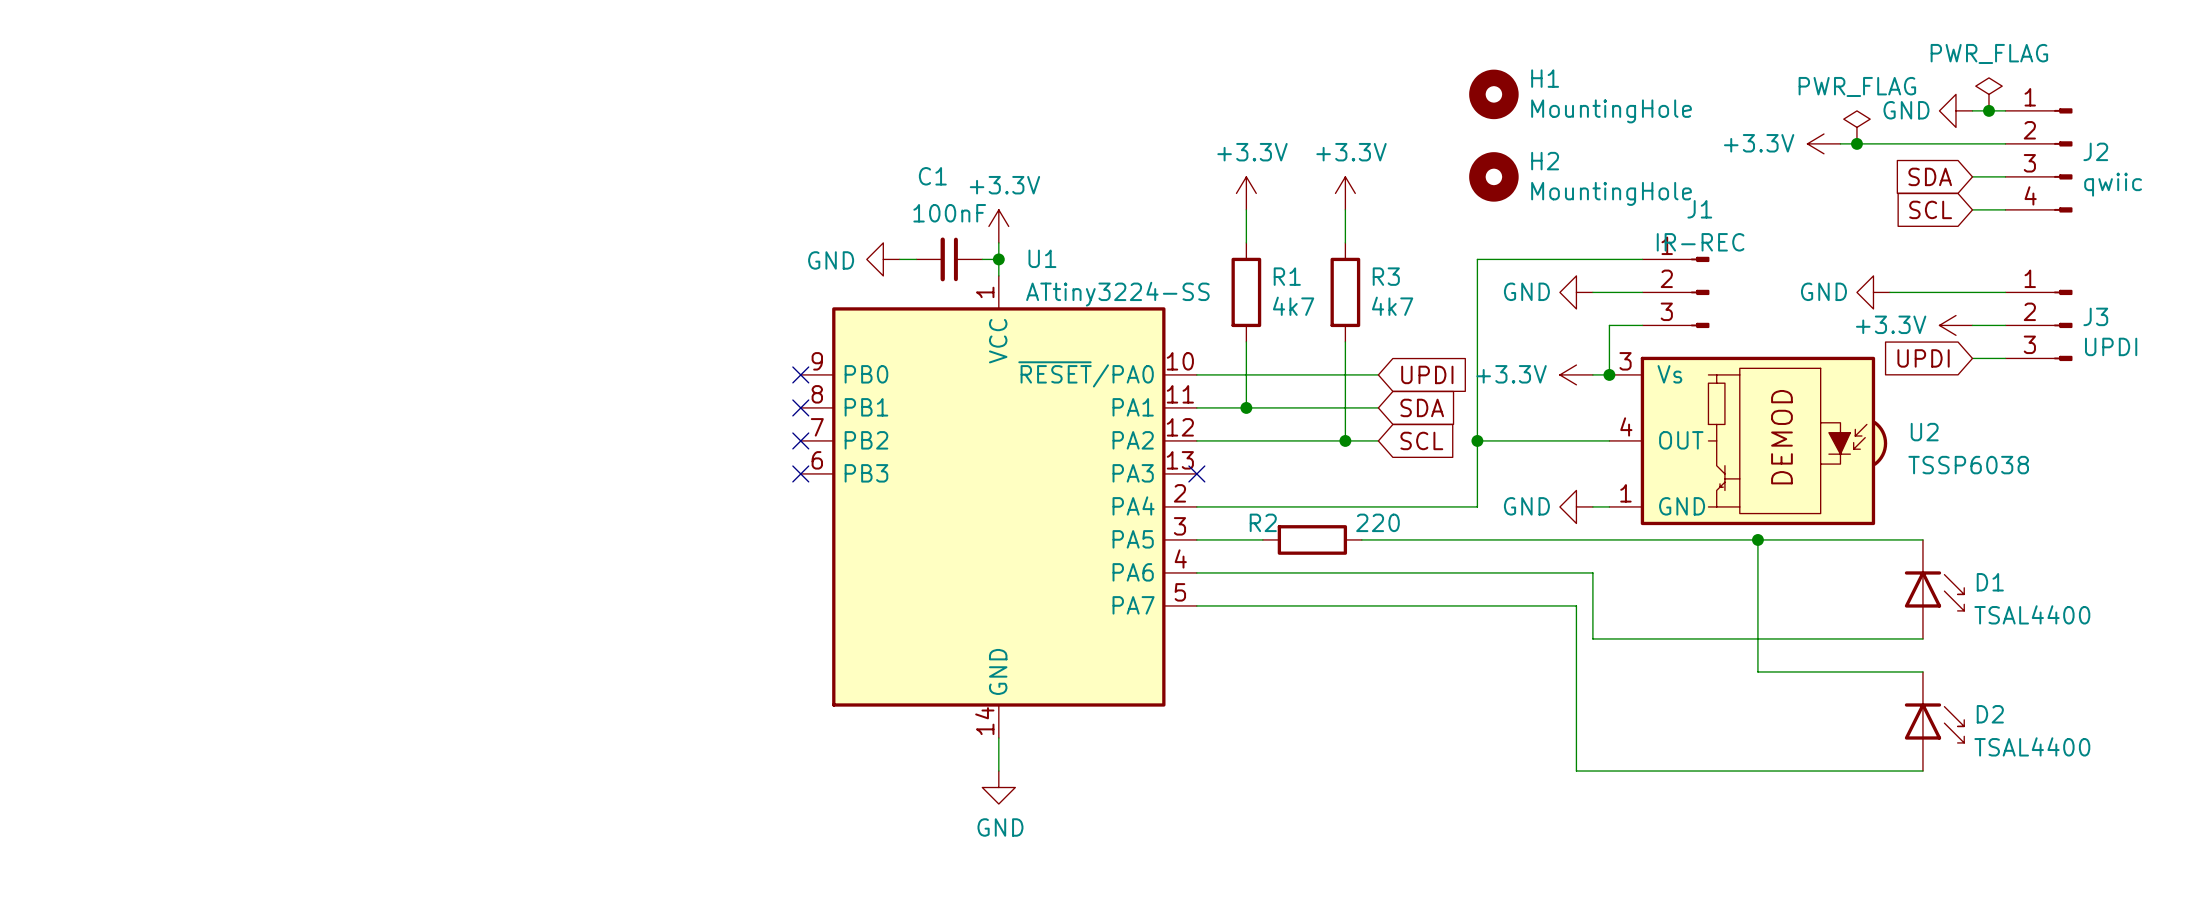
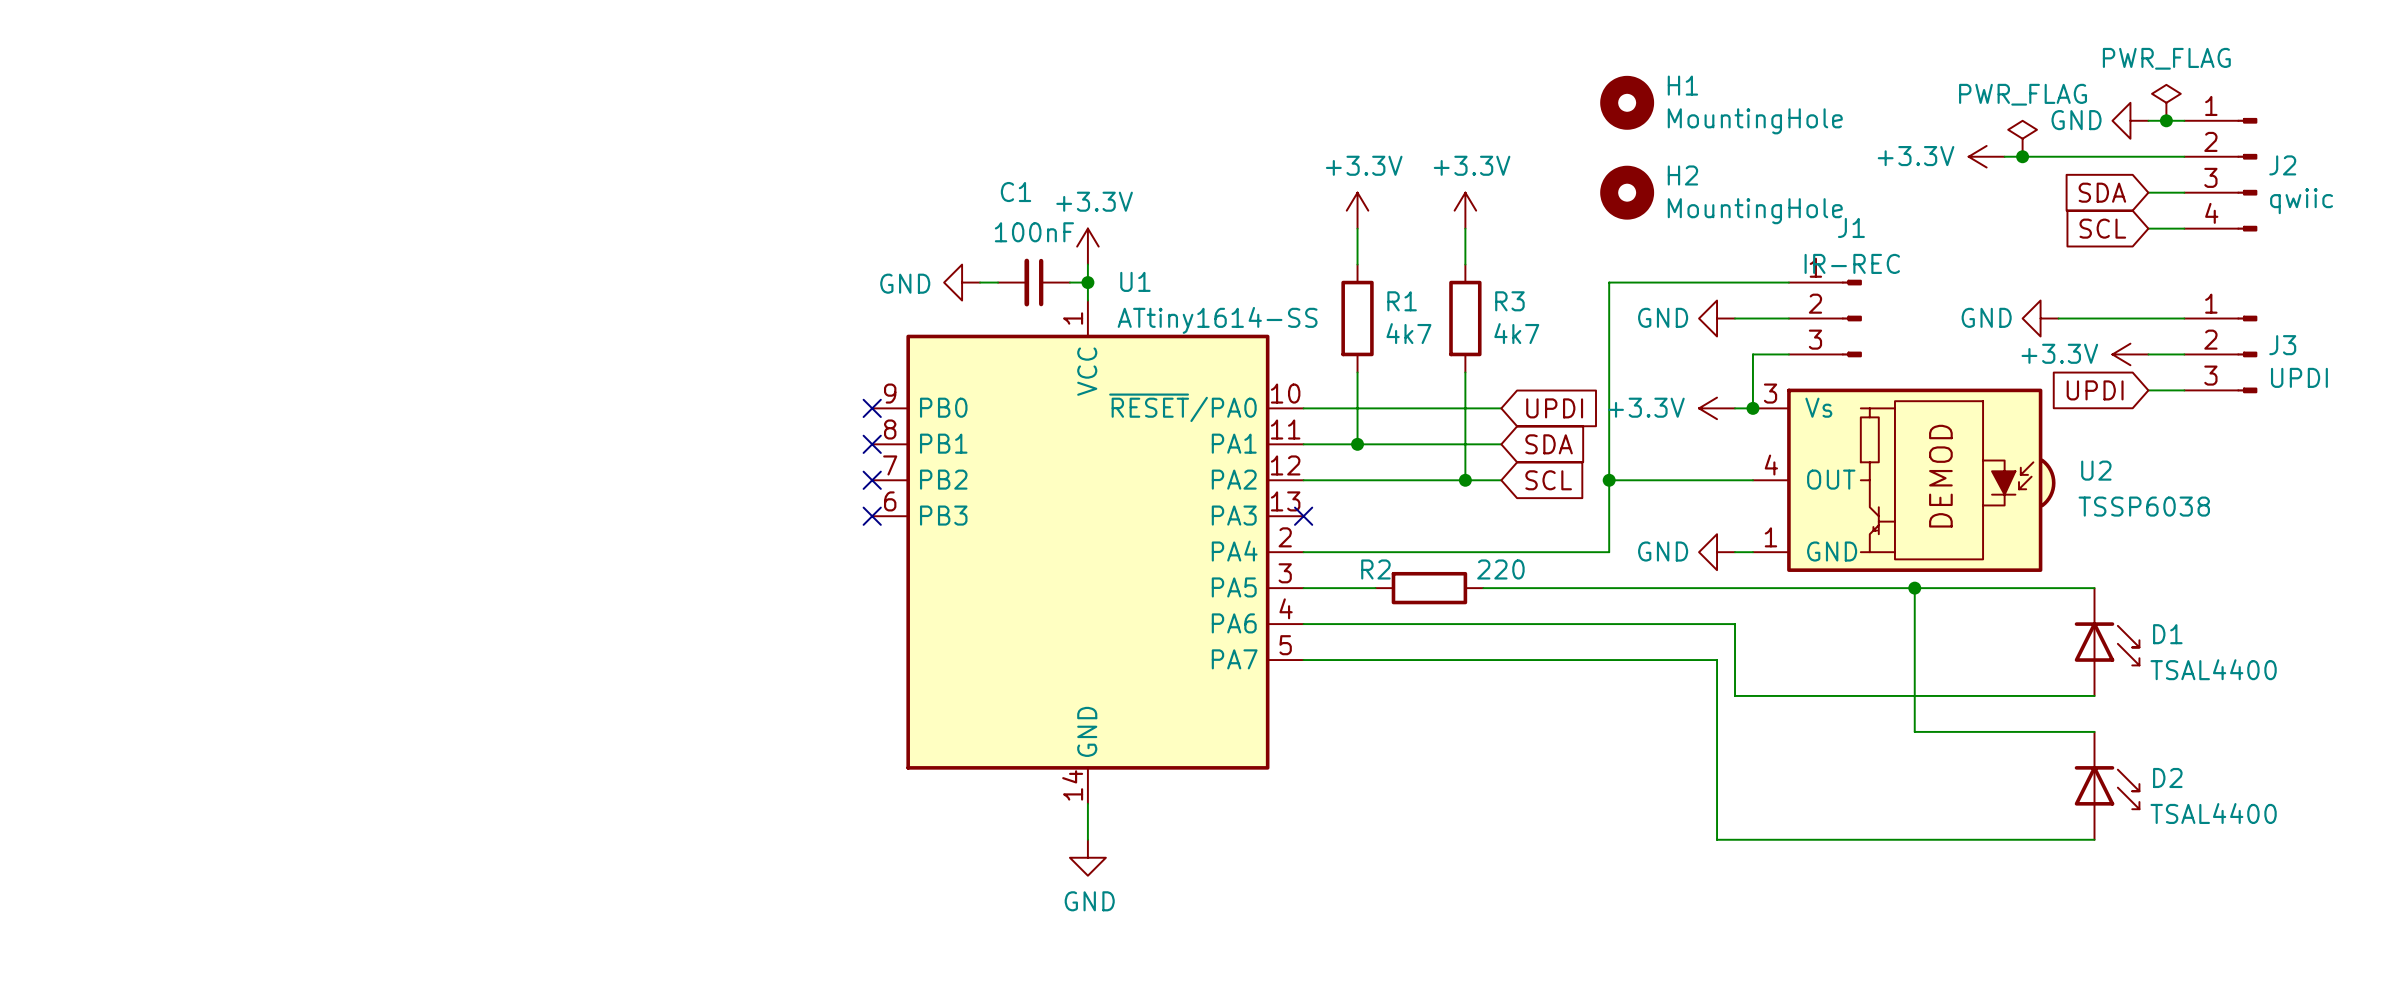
U1 value: ATtiny3224-SS (1117, 294) -> ATtiny1614-SS (1217, 320)

